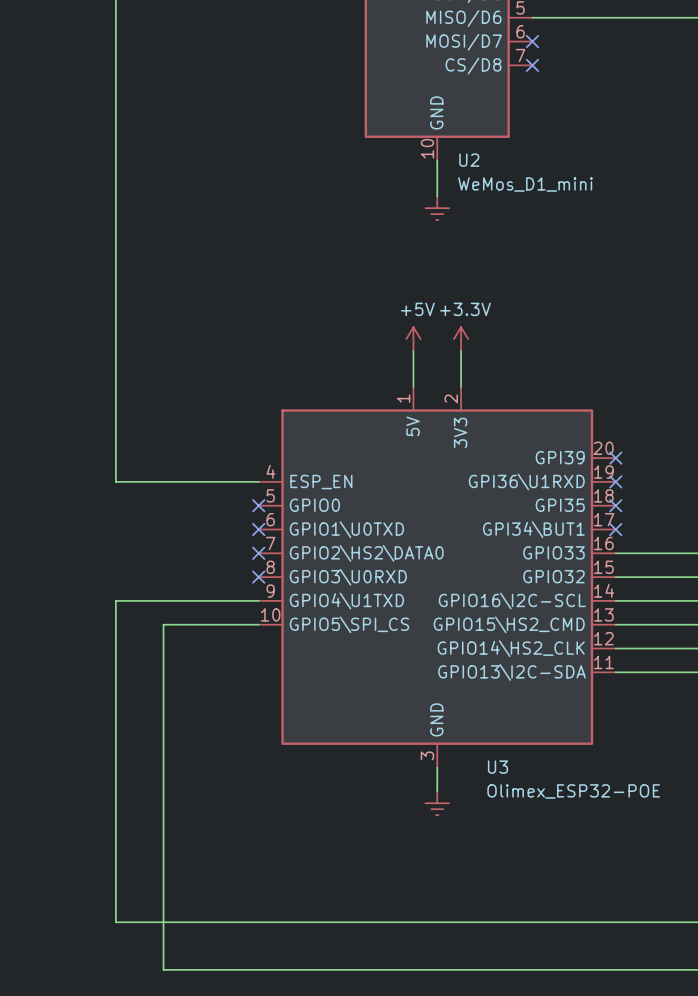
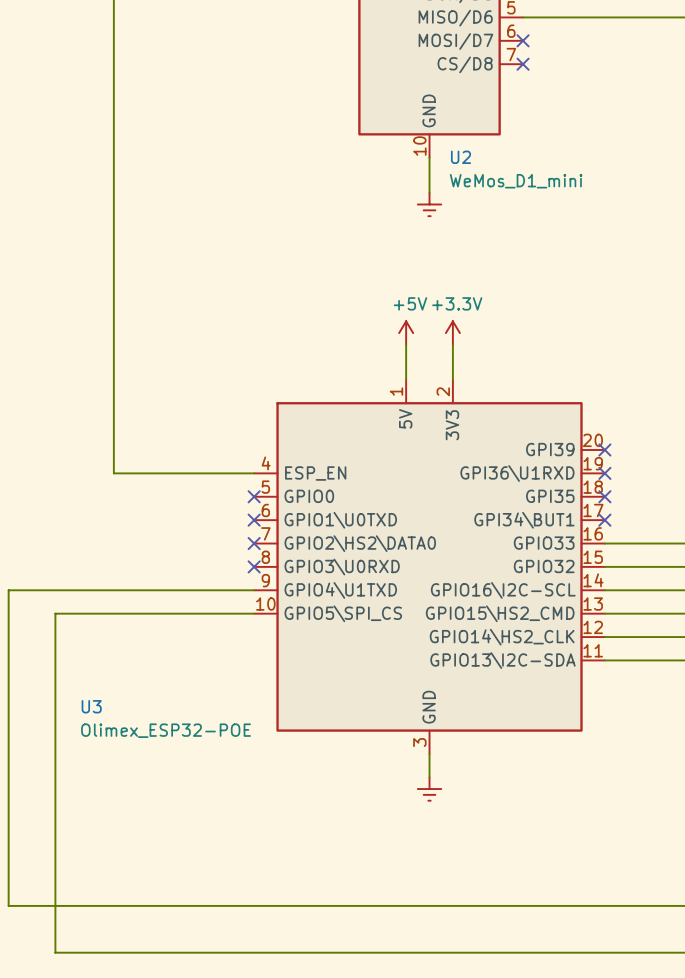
wire: (115, 600) (115, 922) -> (113, 590) (8, 590) (8, 905) (113, 905)
wire: (163, 624) (163, 969) -> (160, 613) (55, 613) (55, 952) (160, 952)
U3 name position: U3 (497, 767) -> U3 (91, 706)
U3 value position: Olimex_ESP32-POE (573, 791) -> Olimex_ESP32-POE (166, 730)

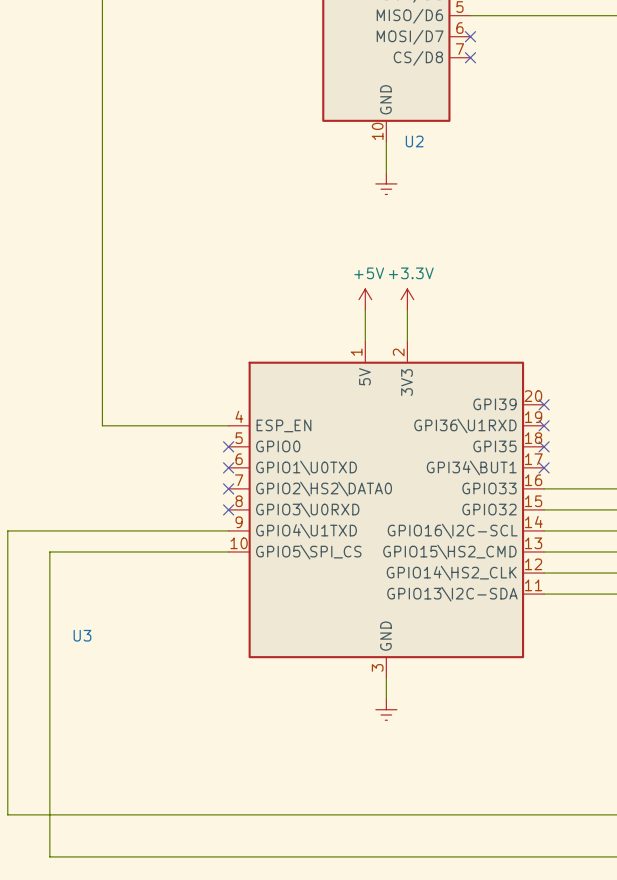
U2 value: WeMos_D1_mini (516, 181) -> none
U3 value: Olimex_ESP32-POE (166, 730) -> none

